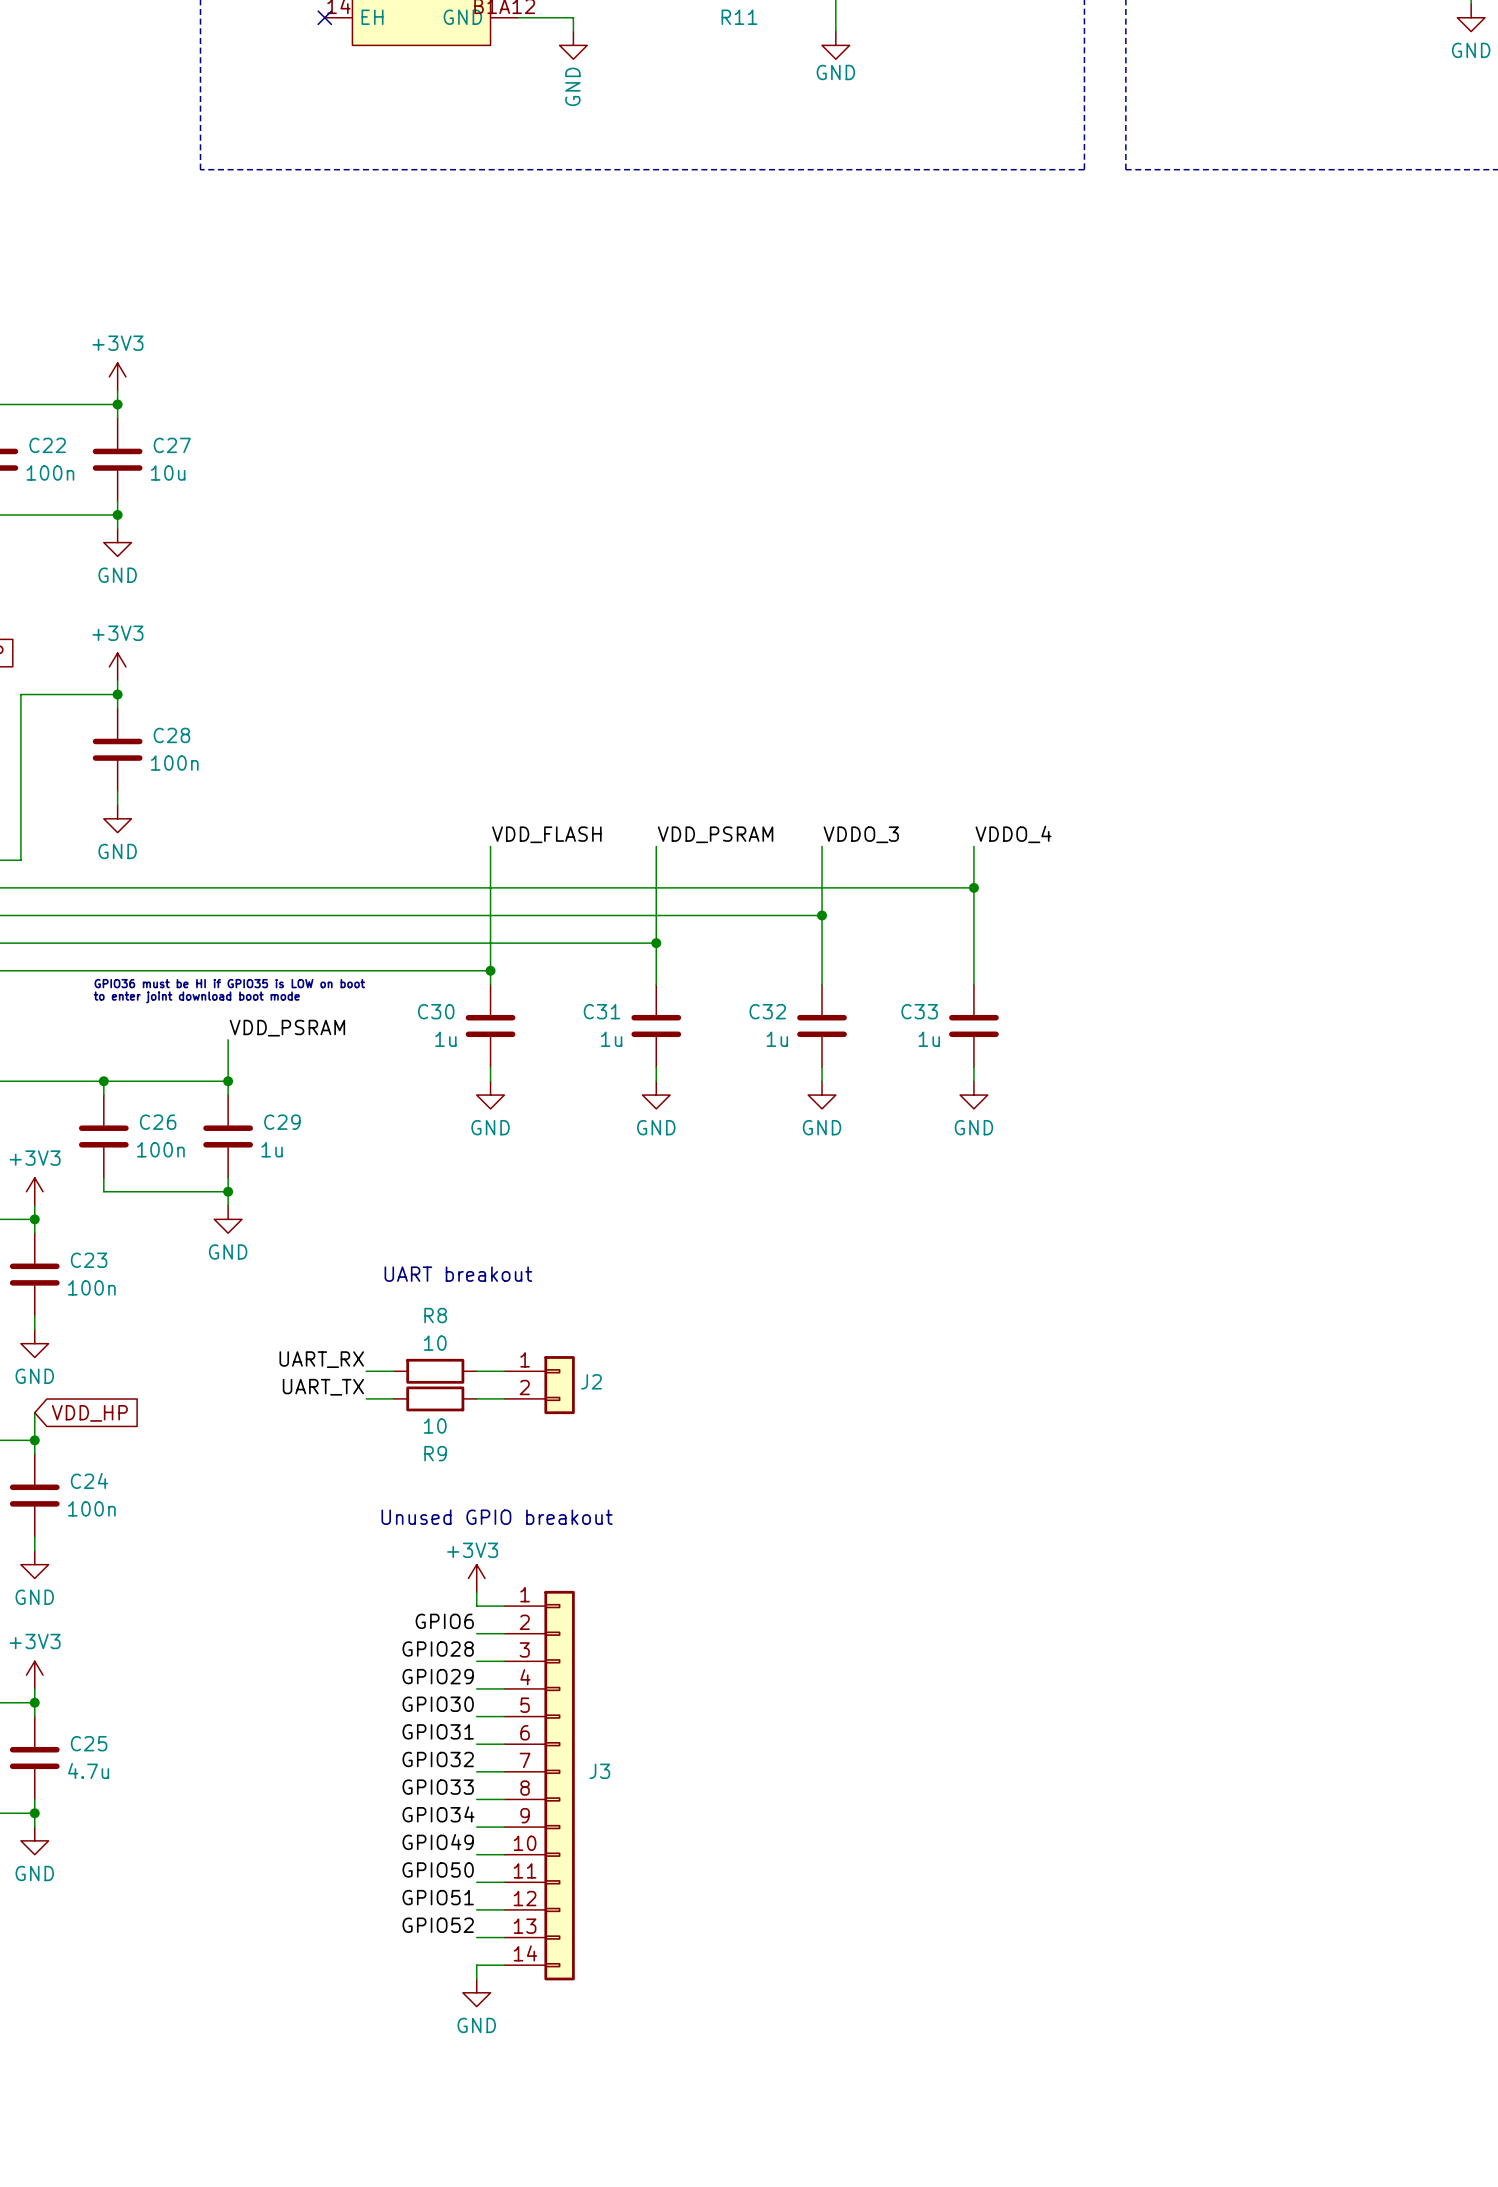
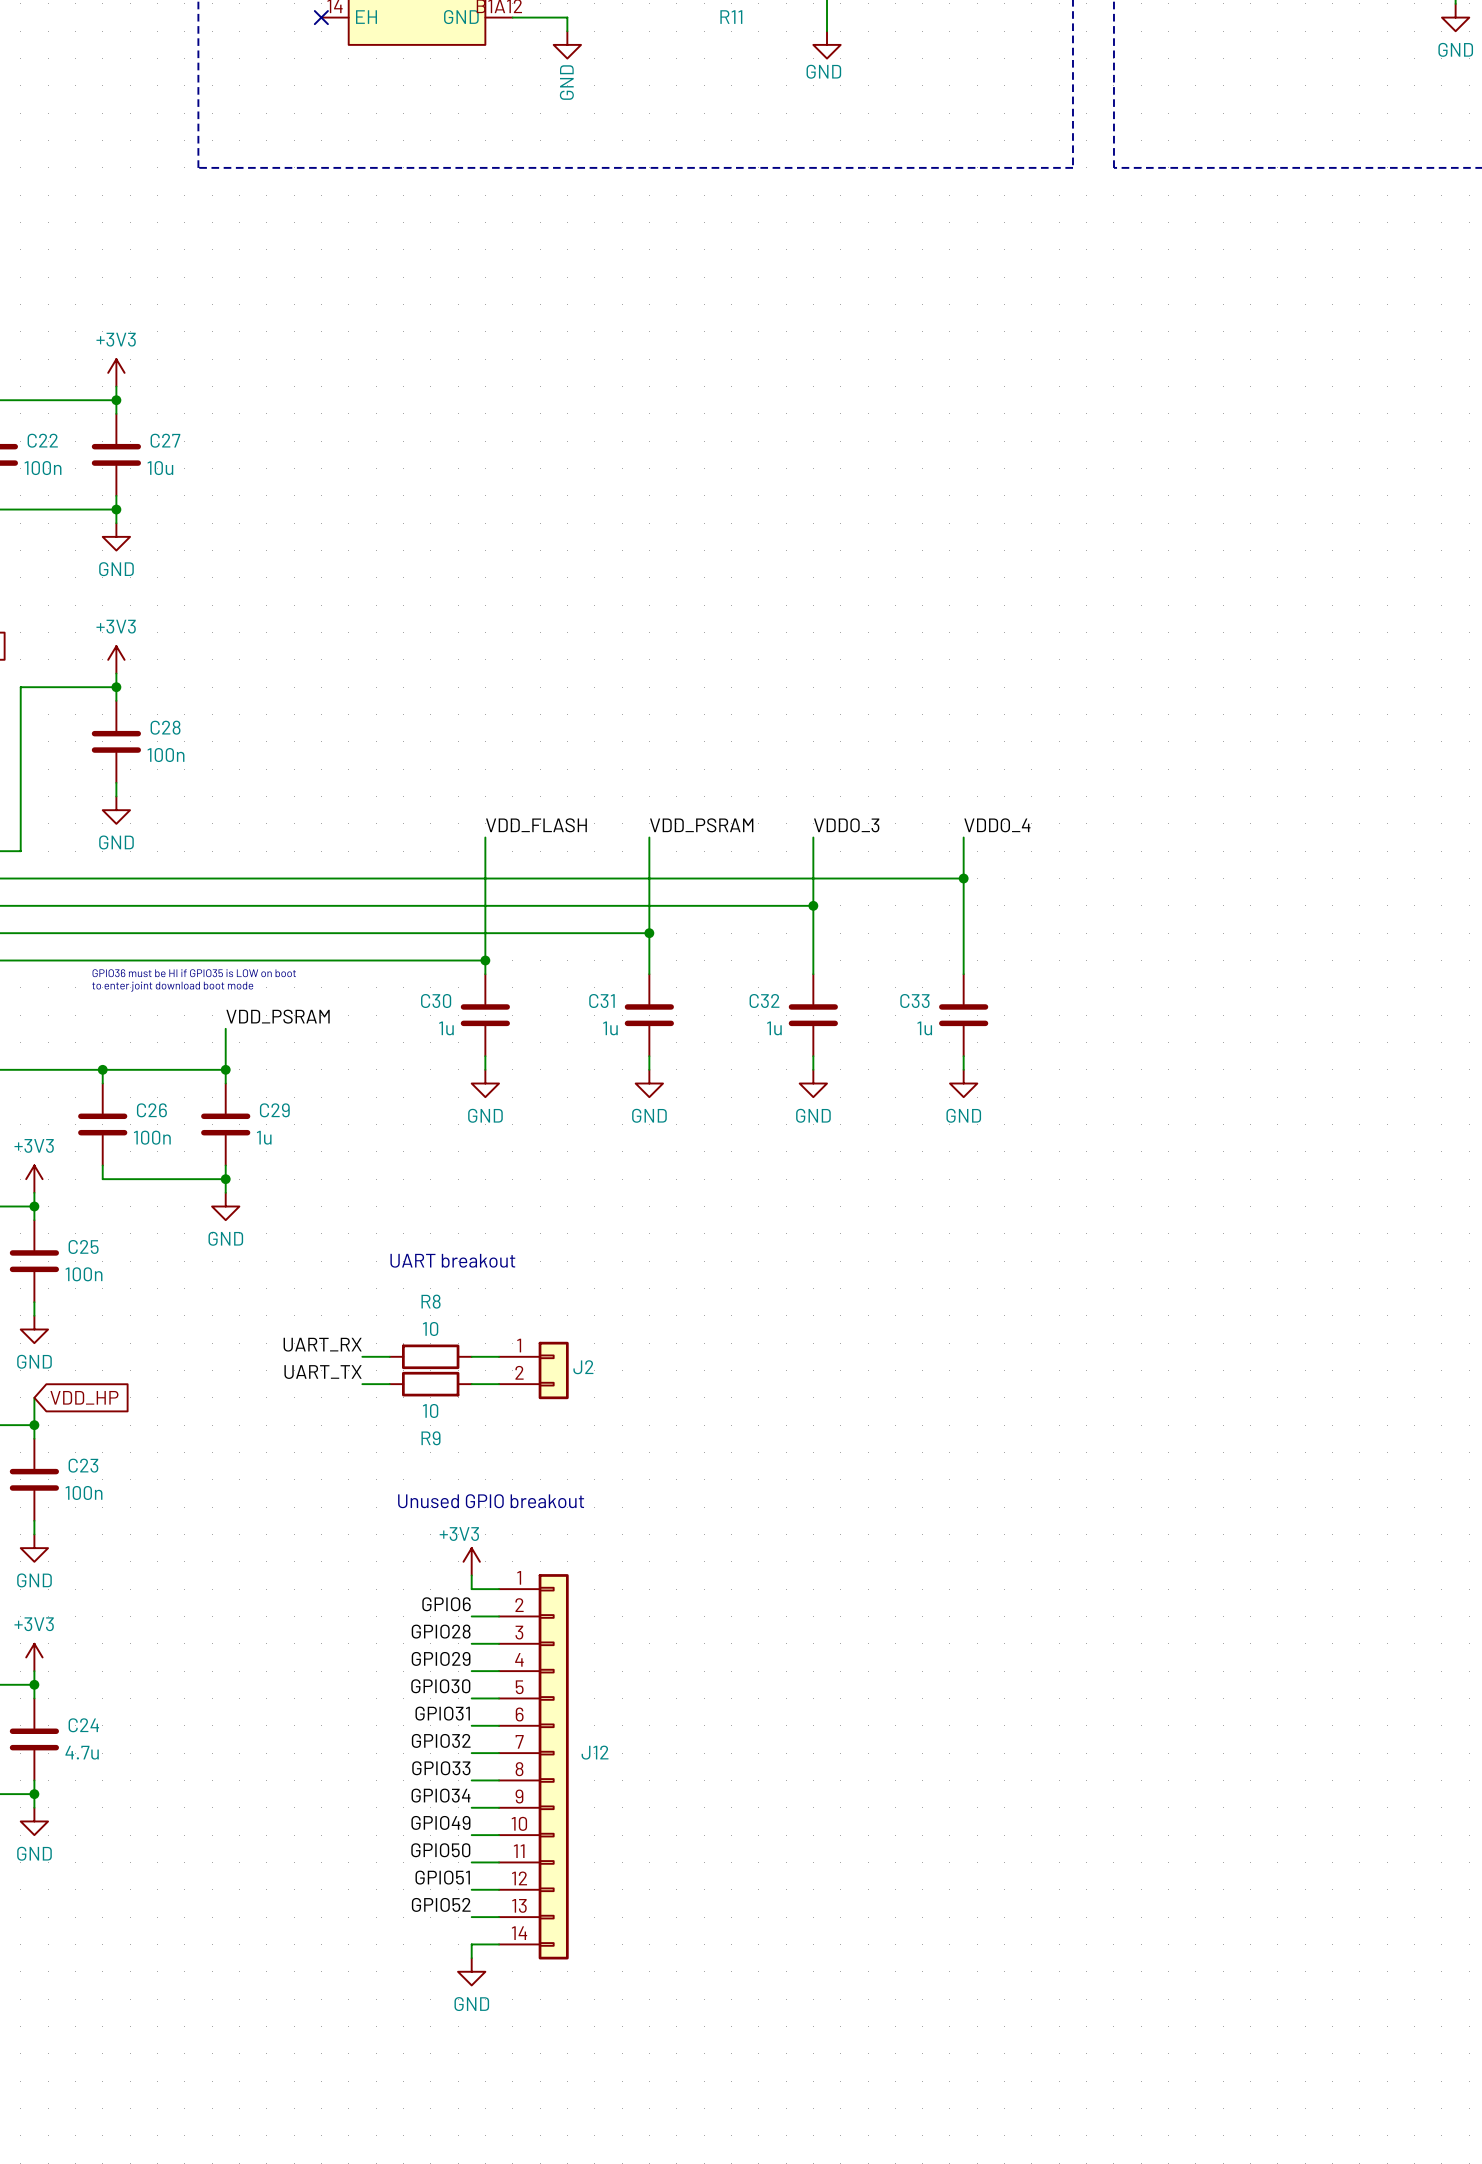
C23 name: C23 (89, 1260) -> C25 (83, 1246)
C24 name: C24 (89, 1480) -> C23 (83, 1465)
C25 name: C25 (89, 1743) -> C24 (83, 1725)
J3 name: J3 (599, 1771) -> J12 (595, 1752)

